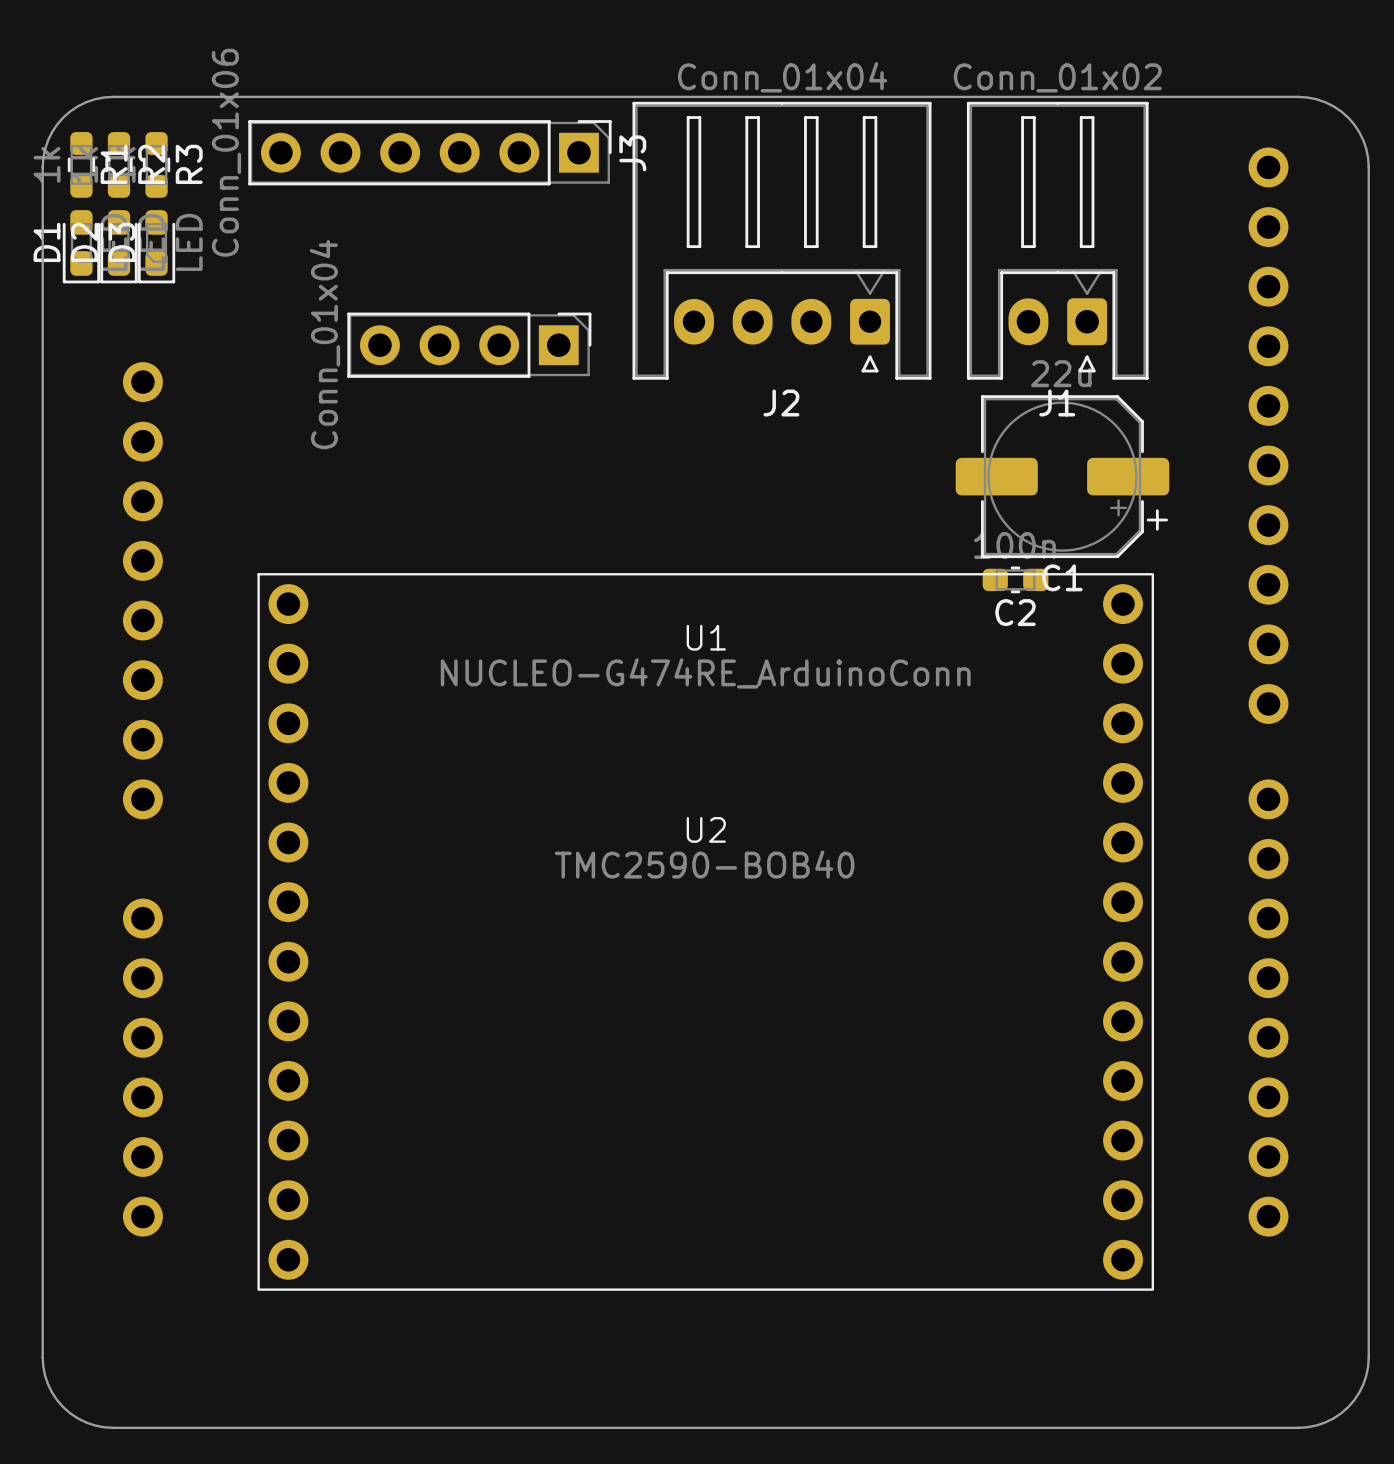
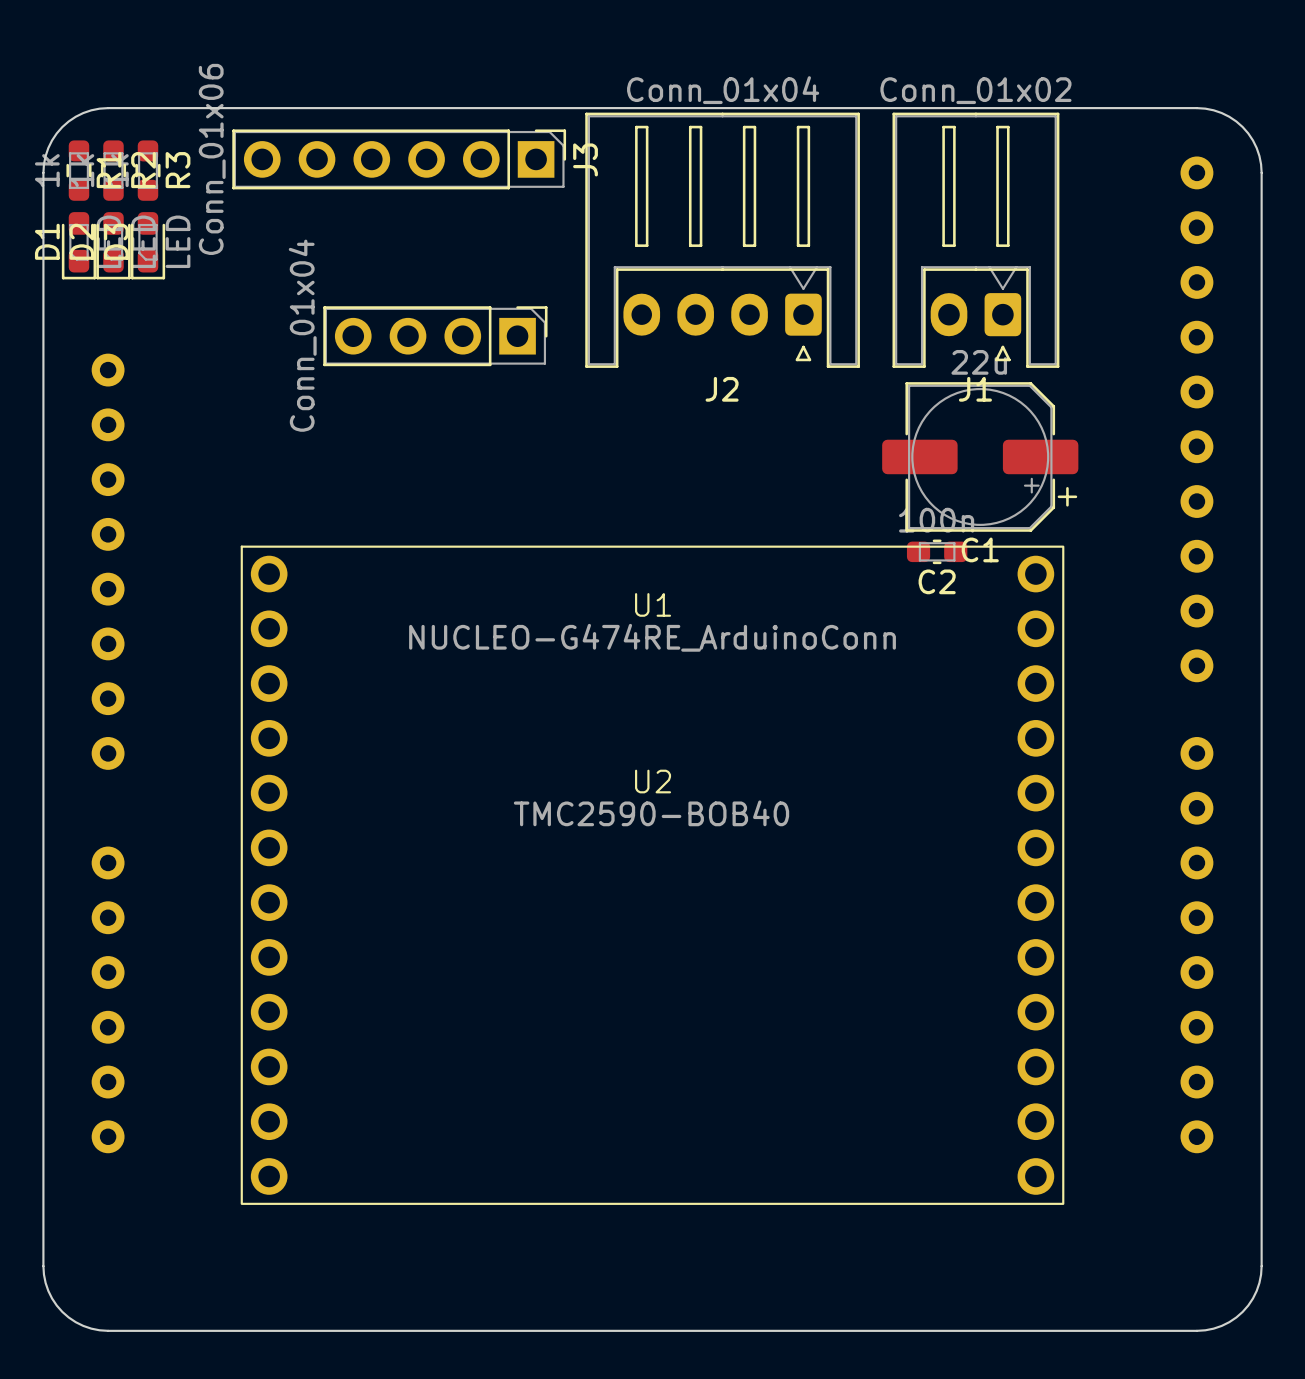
U1 footprint: [122, 147, 1289, 1237] -> [91, 156, 1214, 1154]

